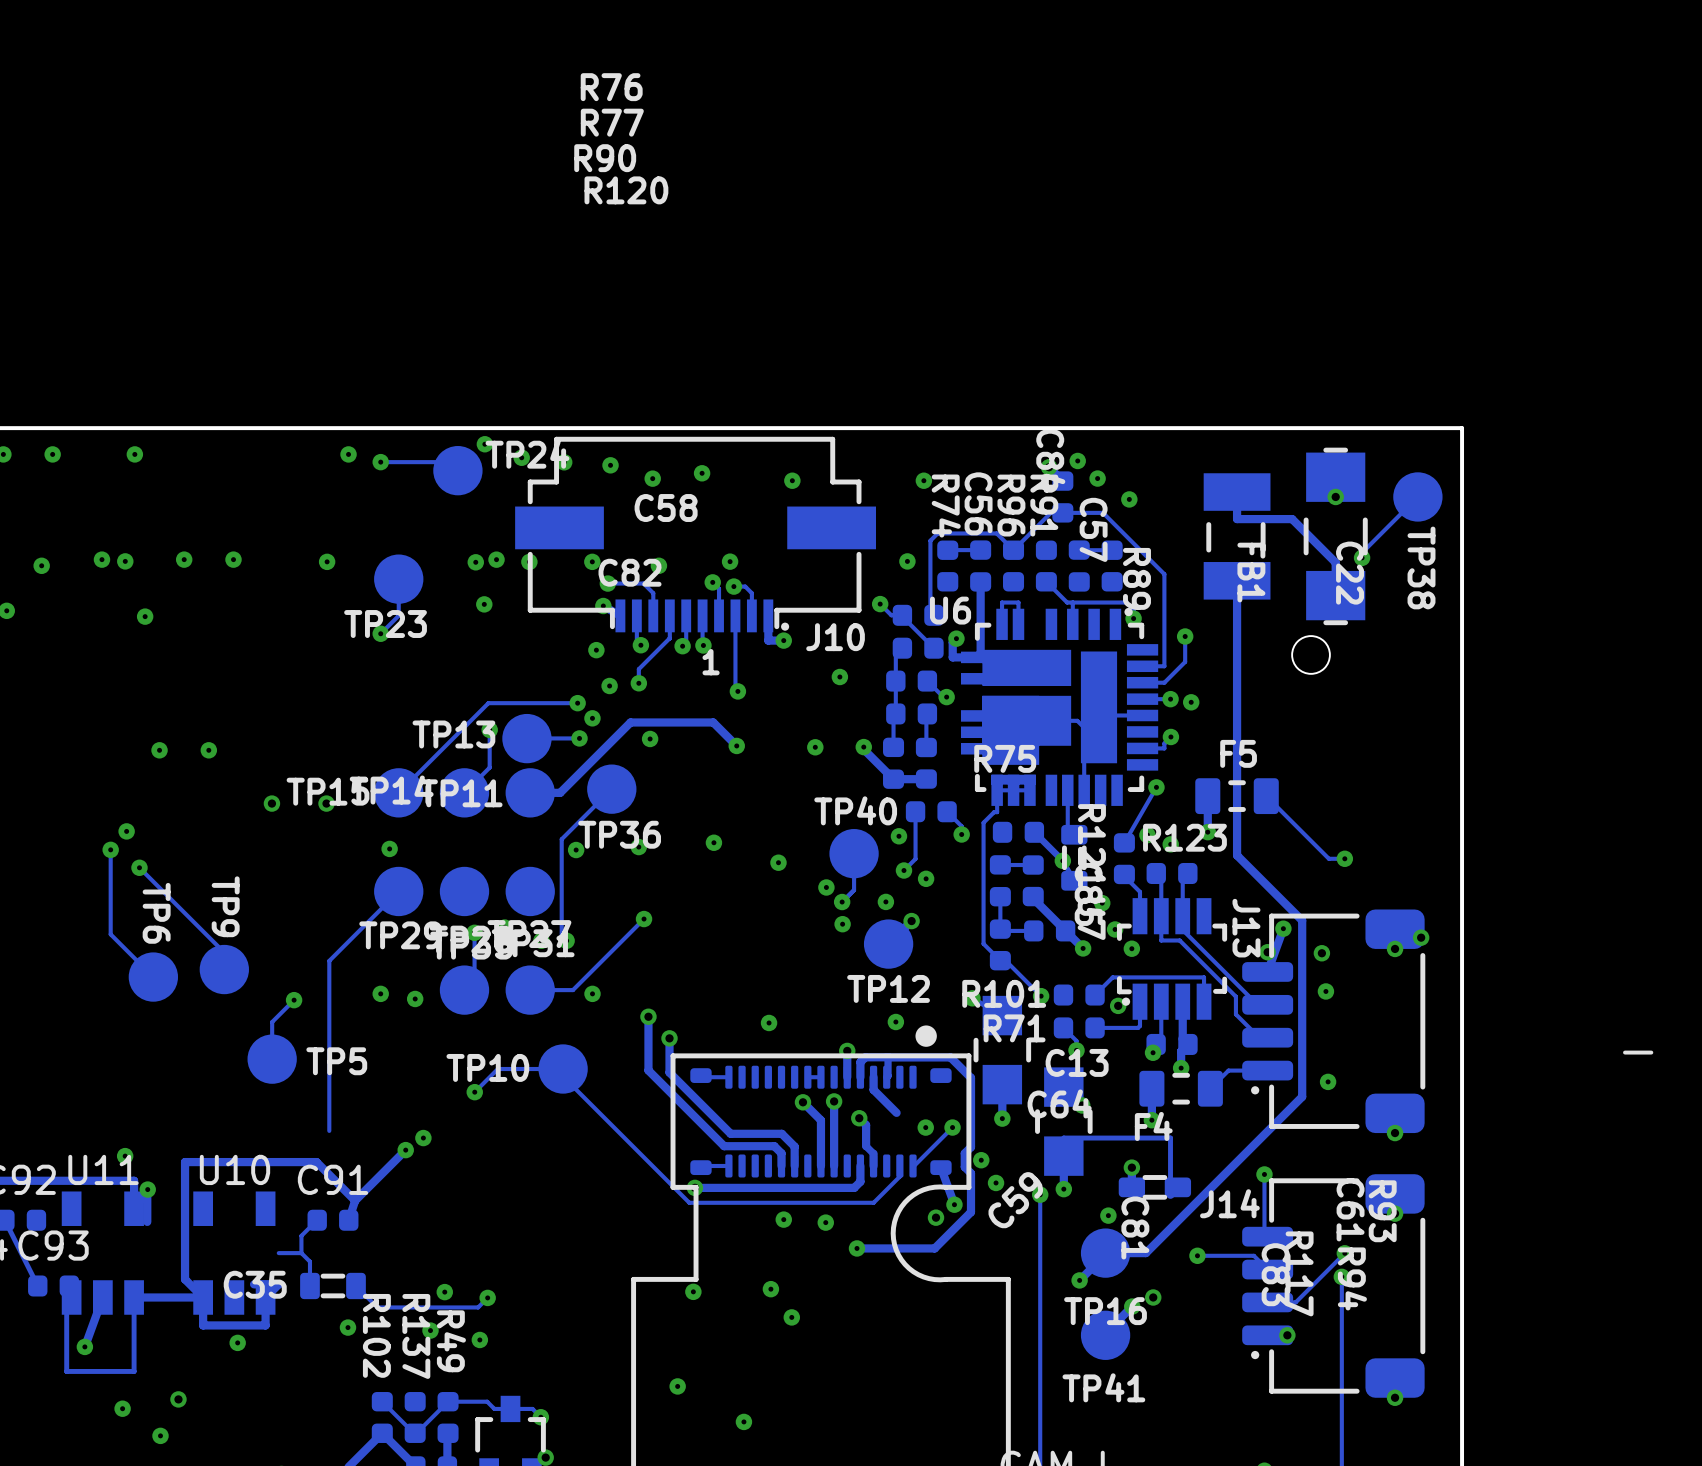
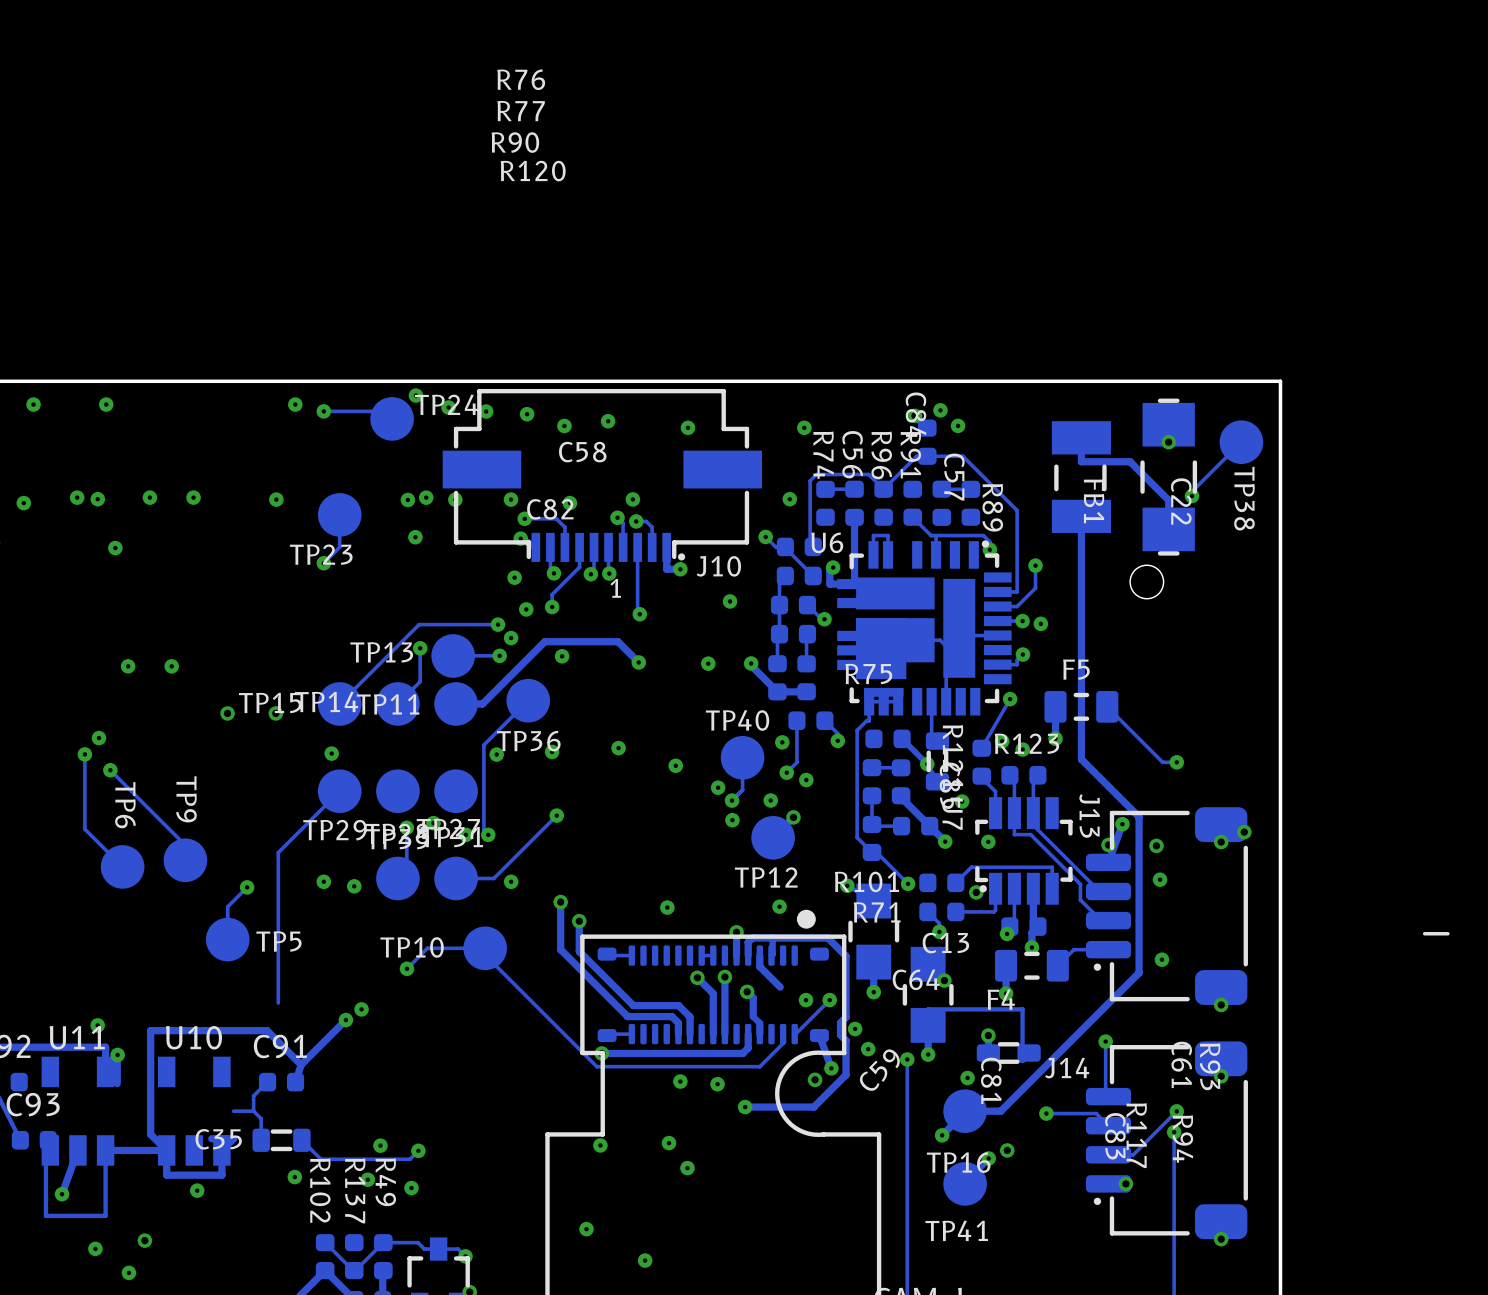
via: (1129, 499) -> none
via: (1115, 929) -> none

